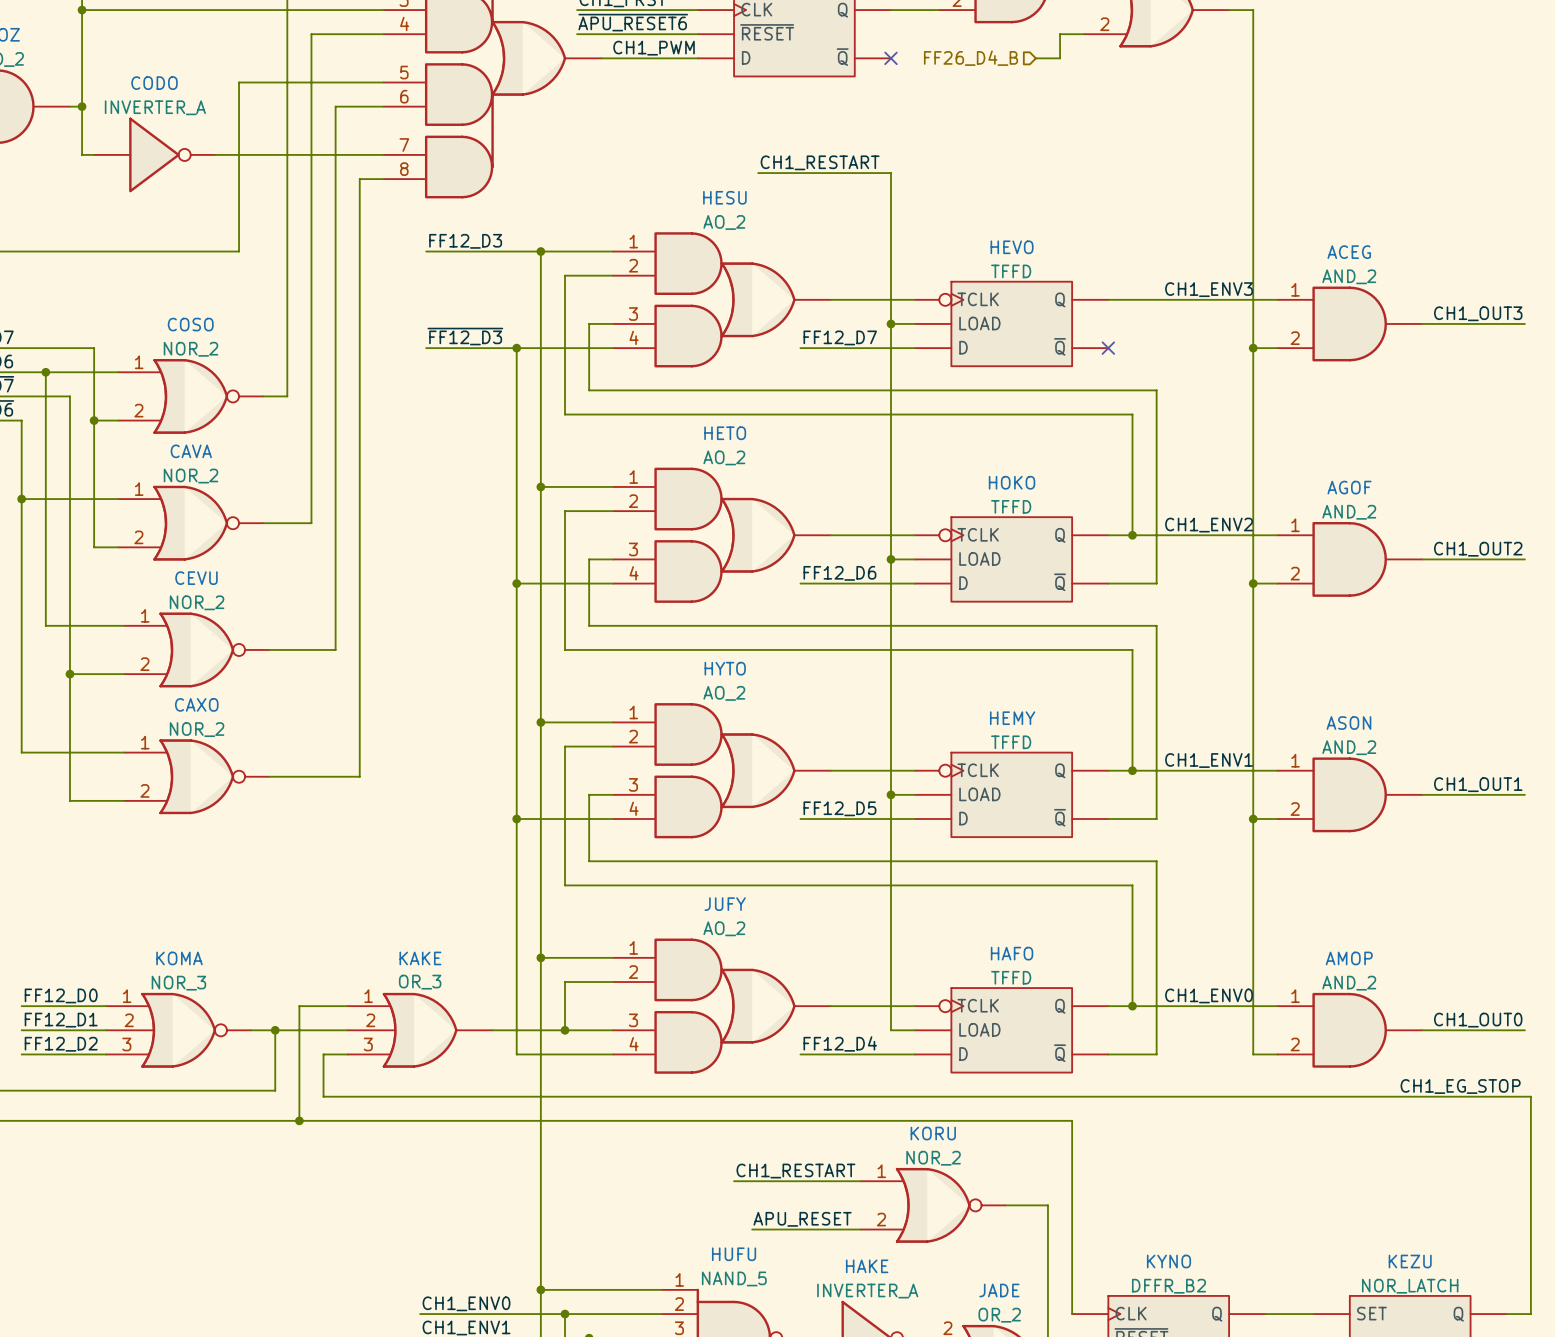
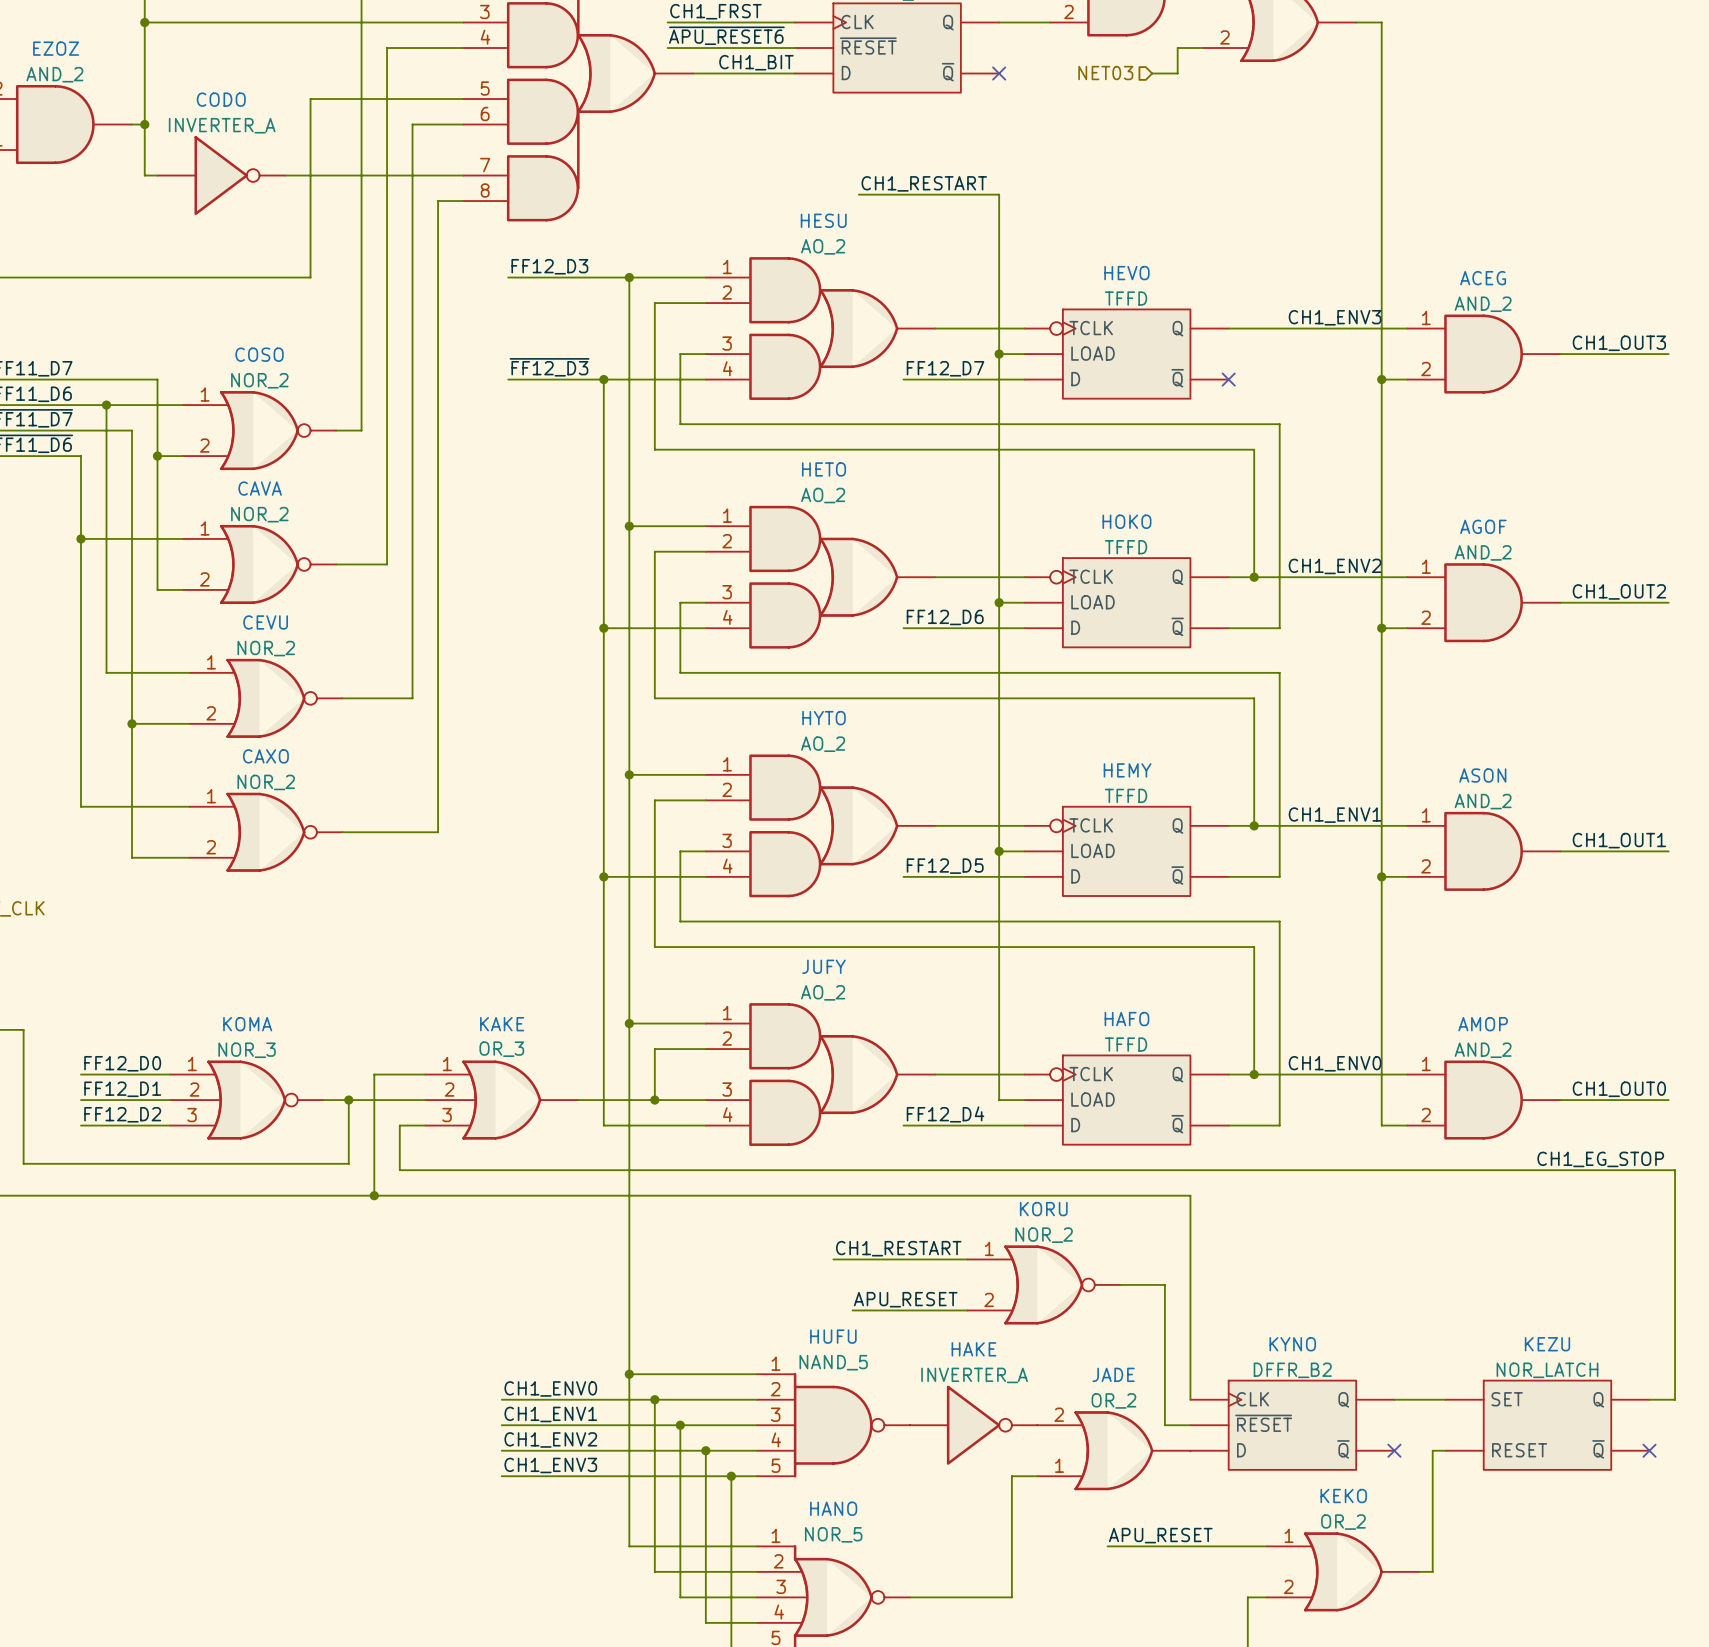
label: CH1_PWM (654, 48) -> CH1_BIT (756, 62)
hierarchical label: FF26_D4_B (971, 58) -> NET03 (1105, 73)

